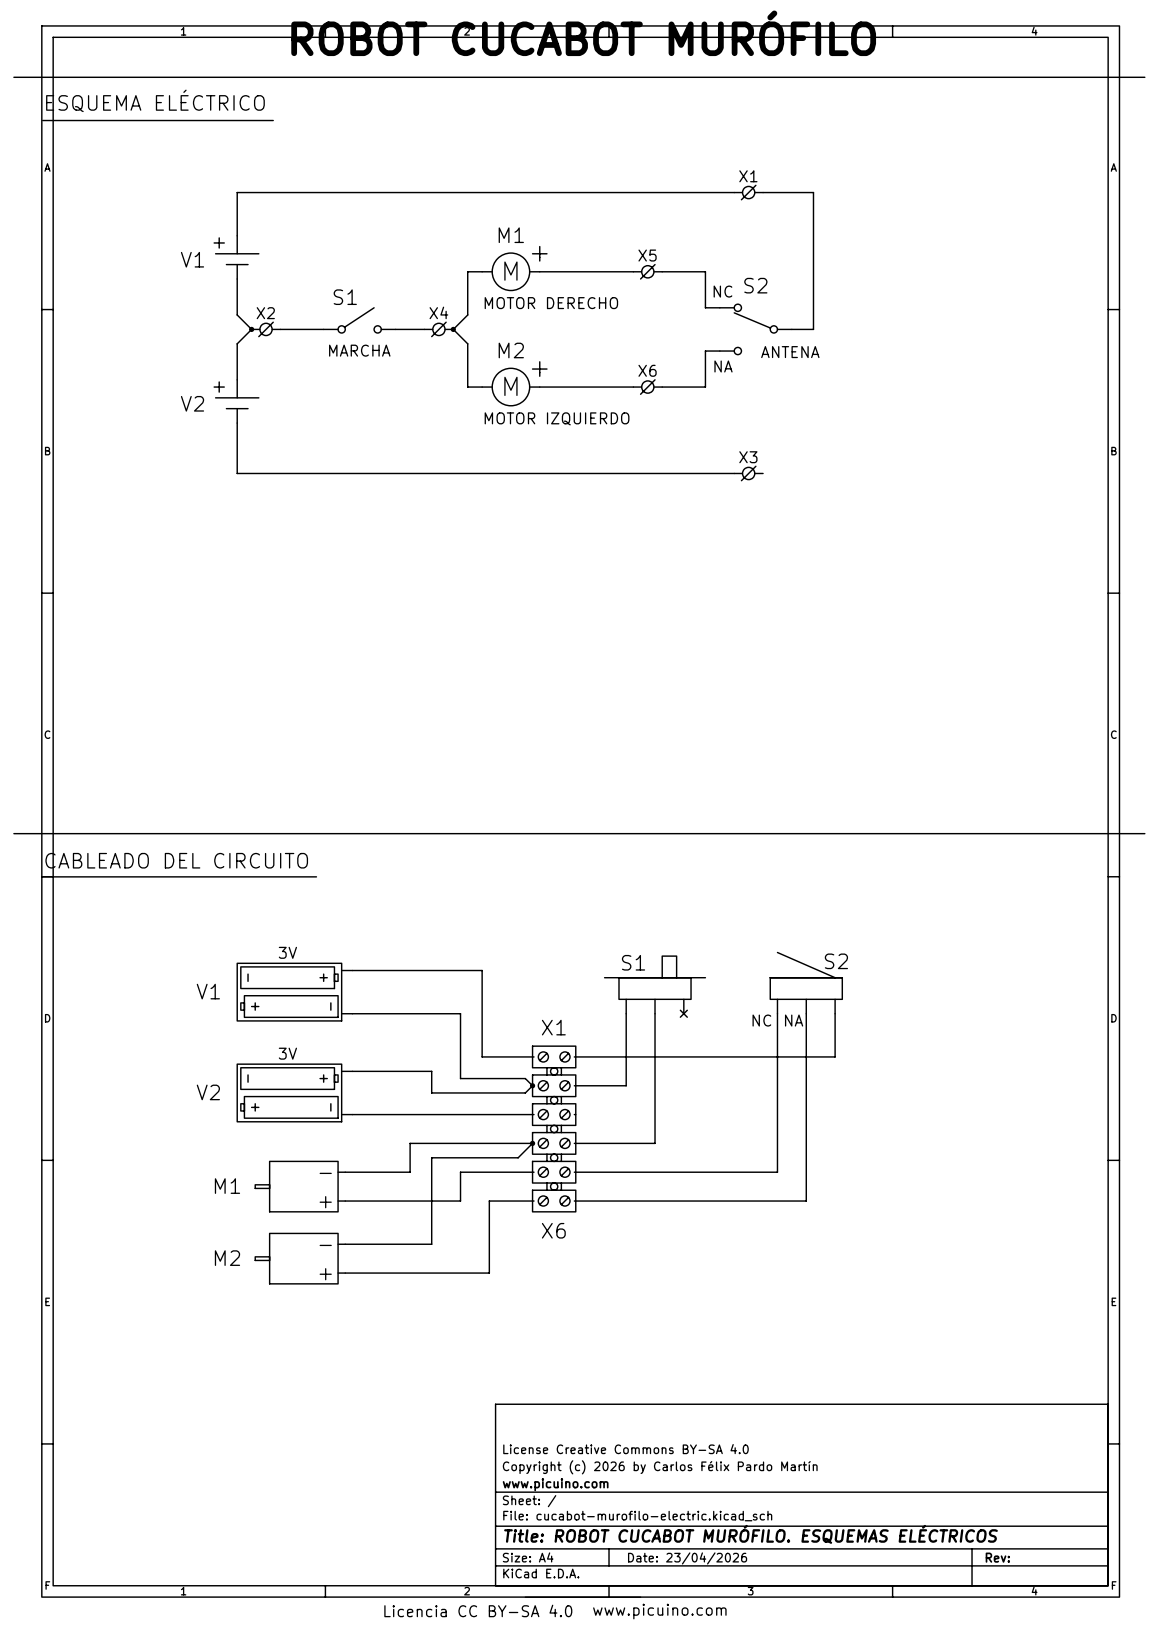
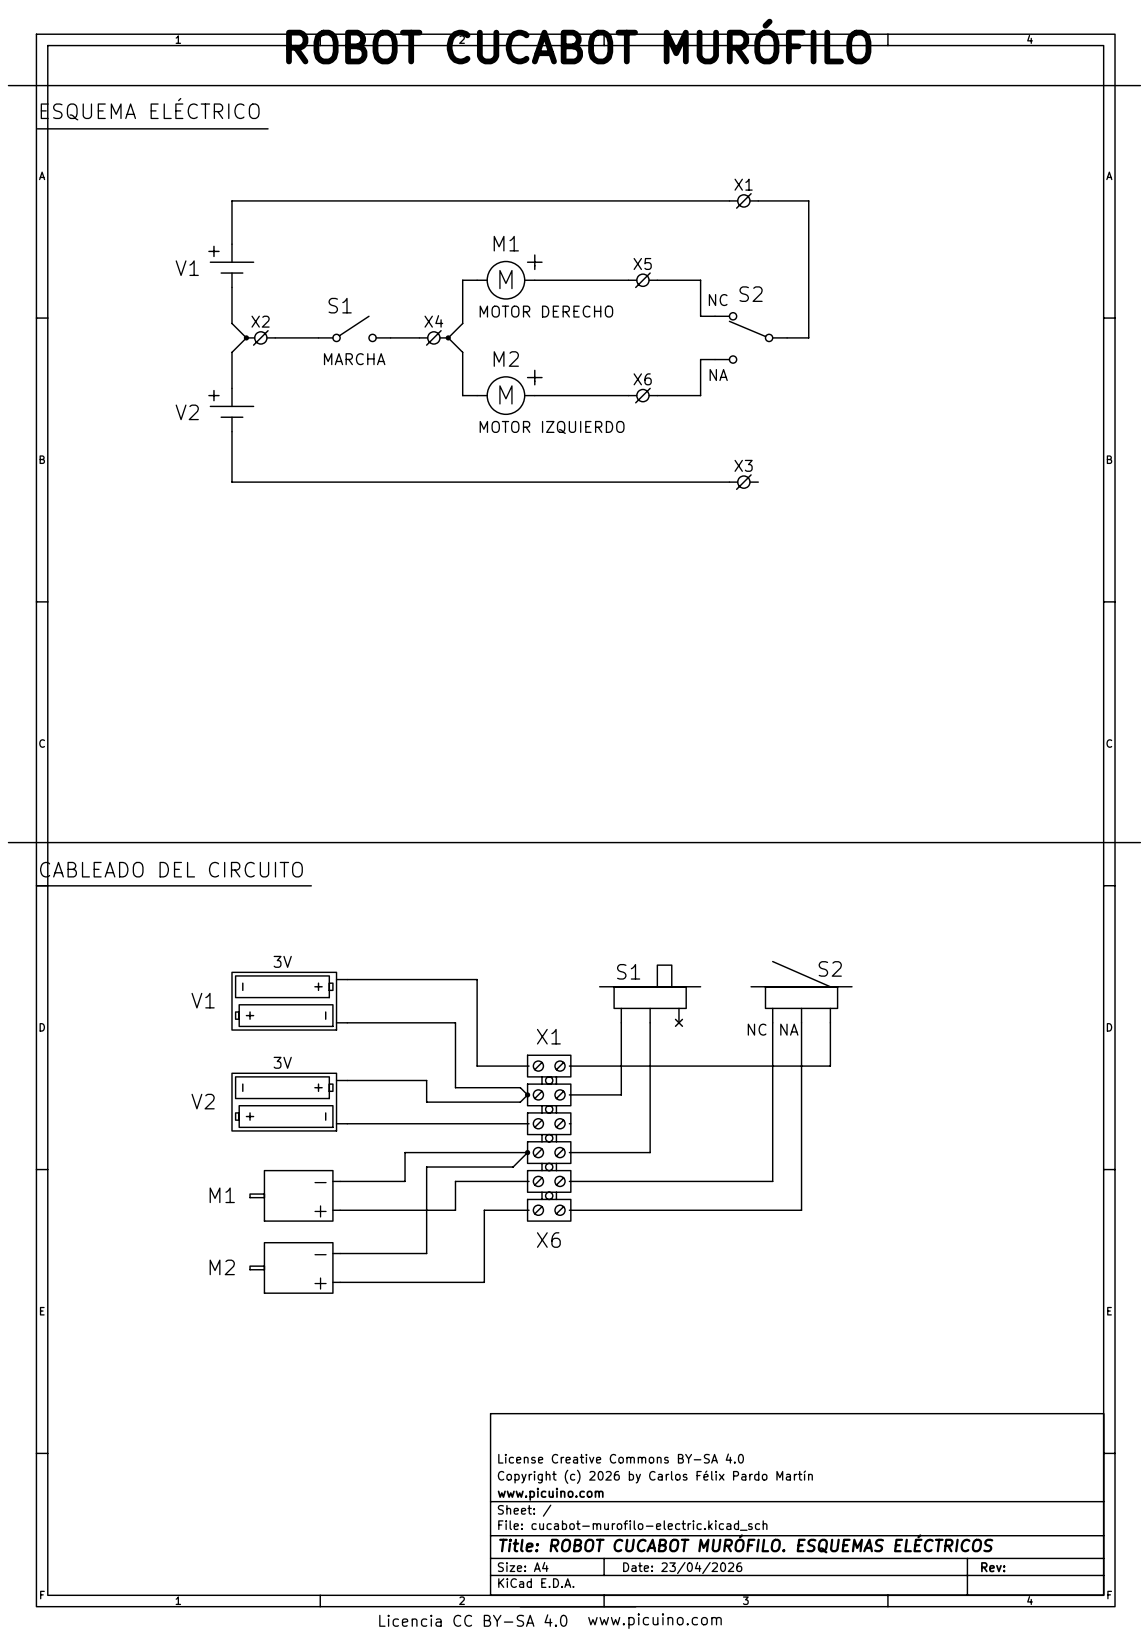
text: ANTENA (790, 352) -> none
S2 symbol: [770, 952, 843, 1014] -> [751, 961, 853, 1023]

